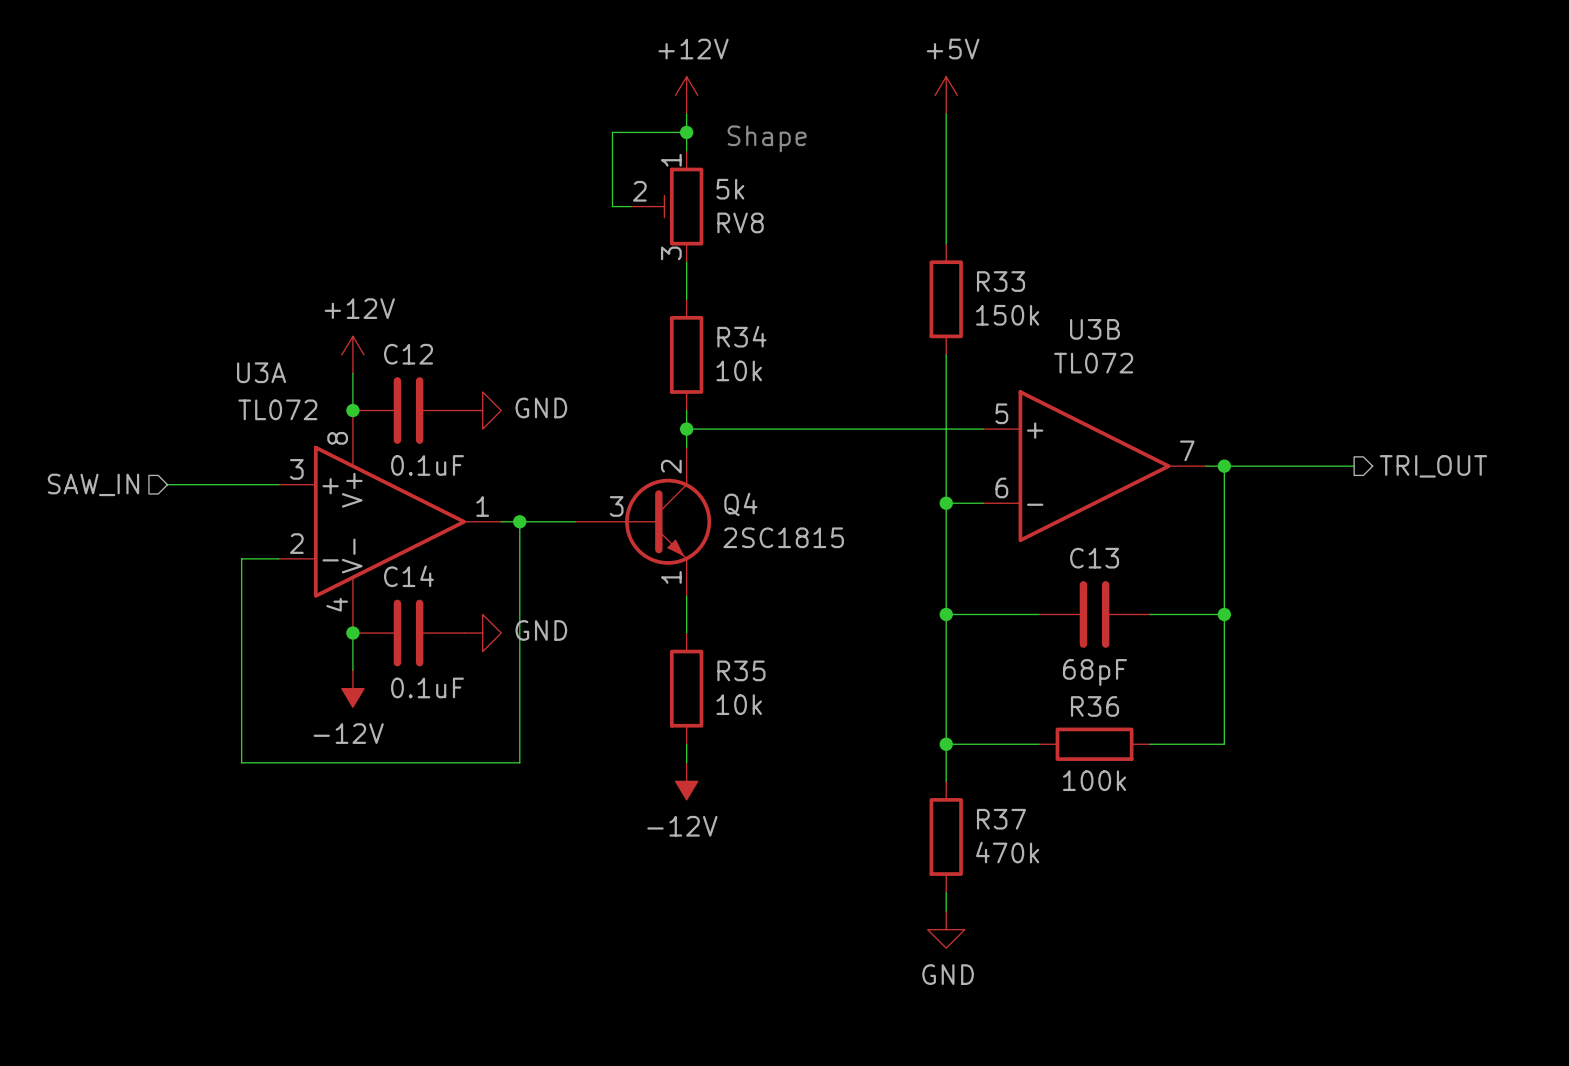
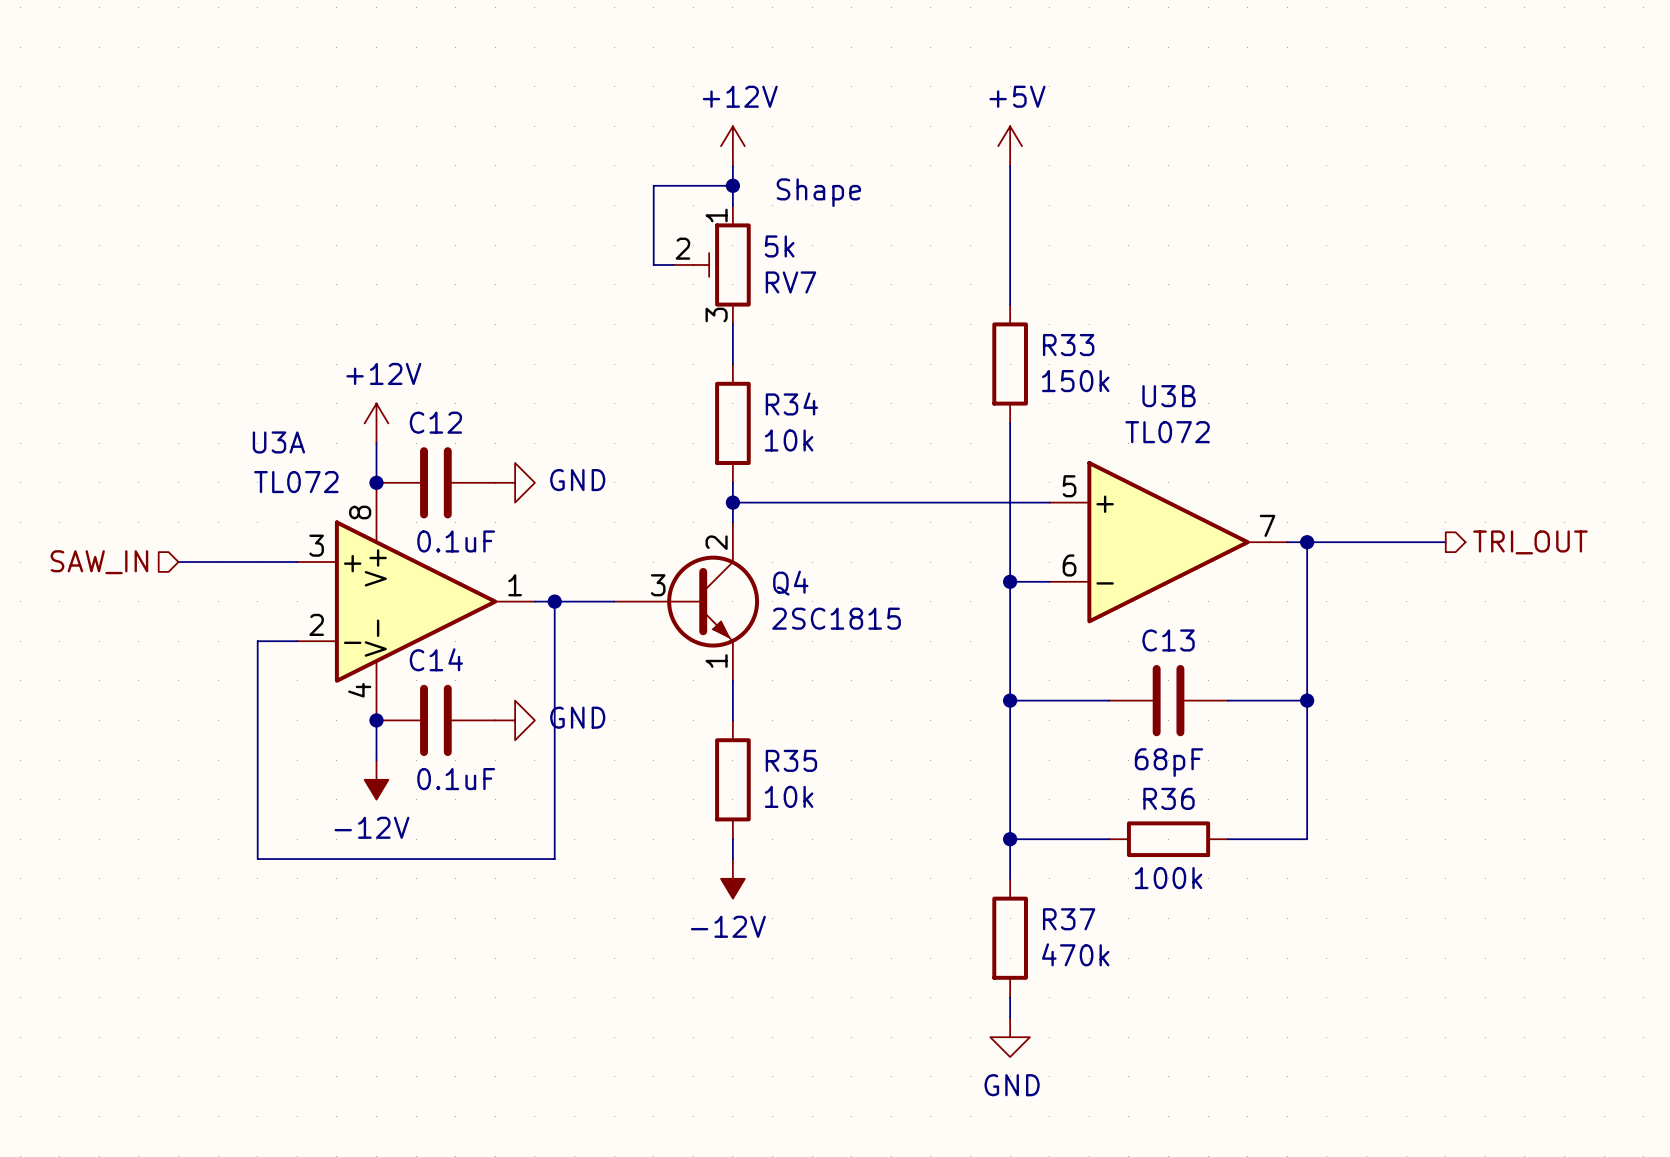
RV8 name: RV8 (740, 222) -> RV7 (790, 282)

